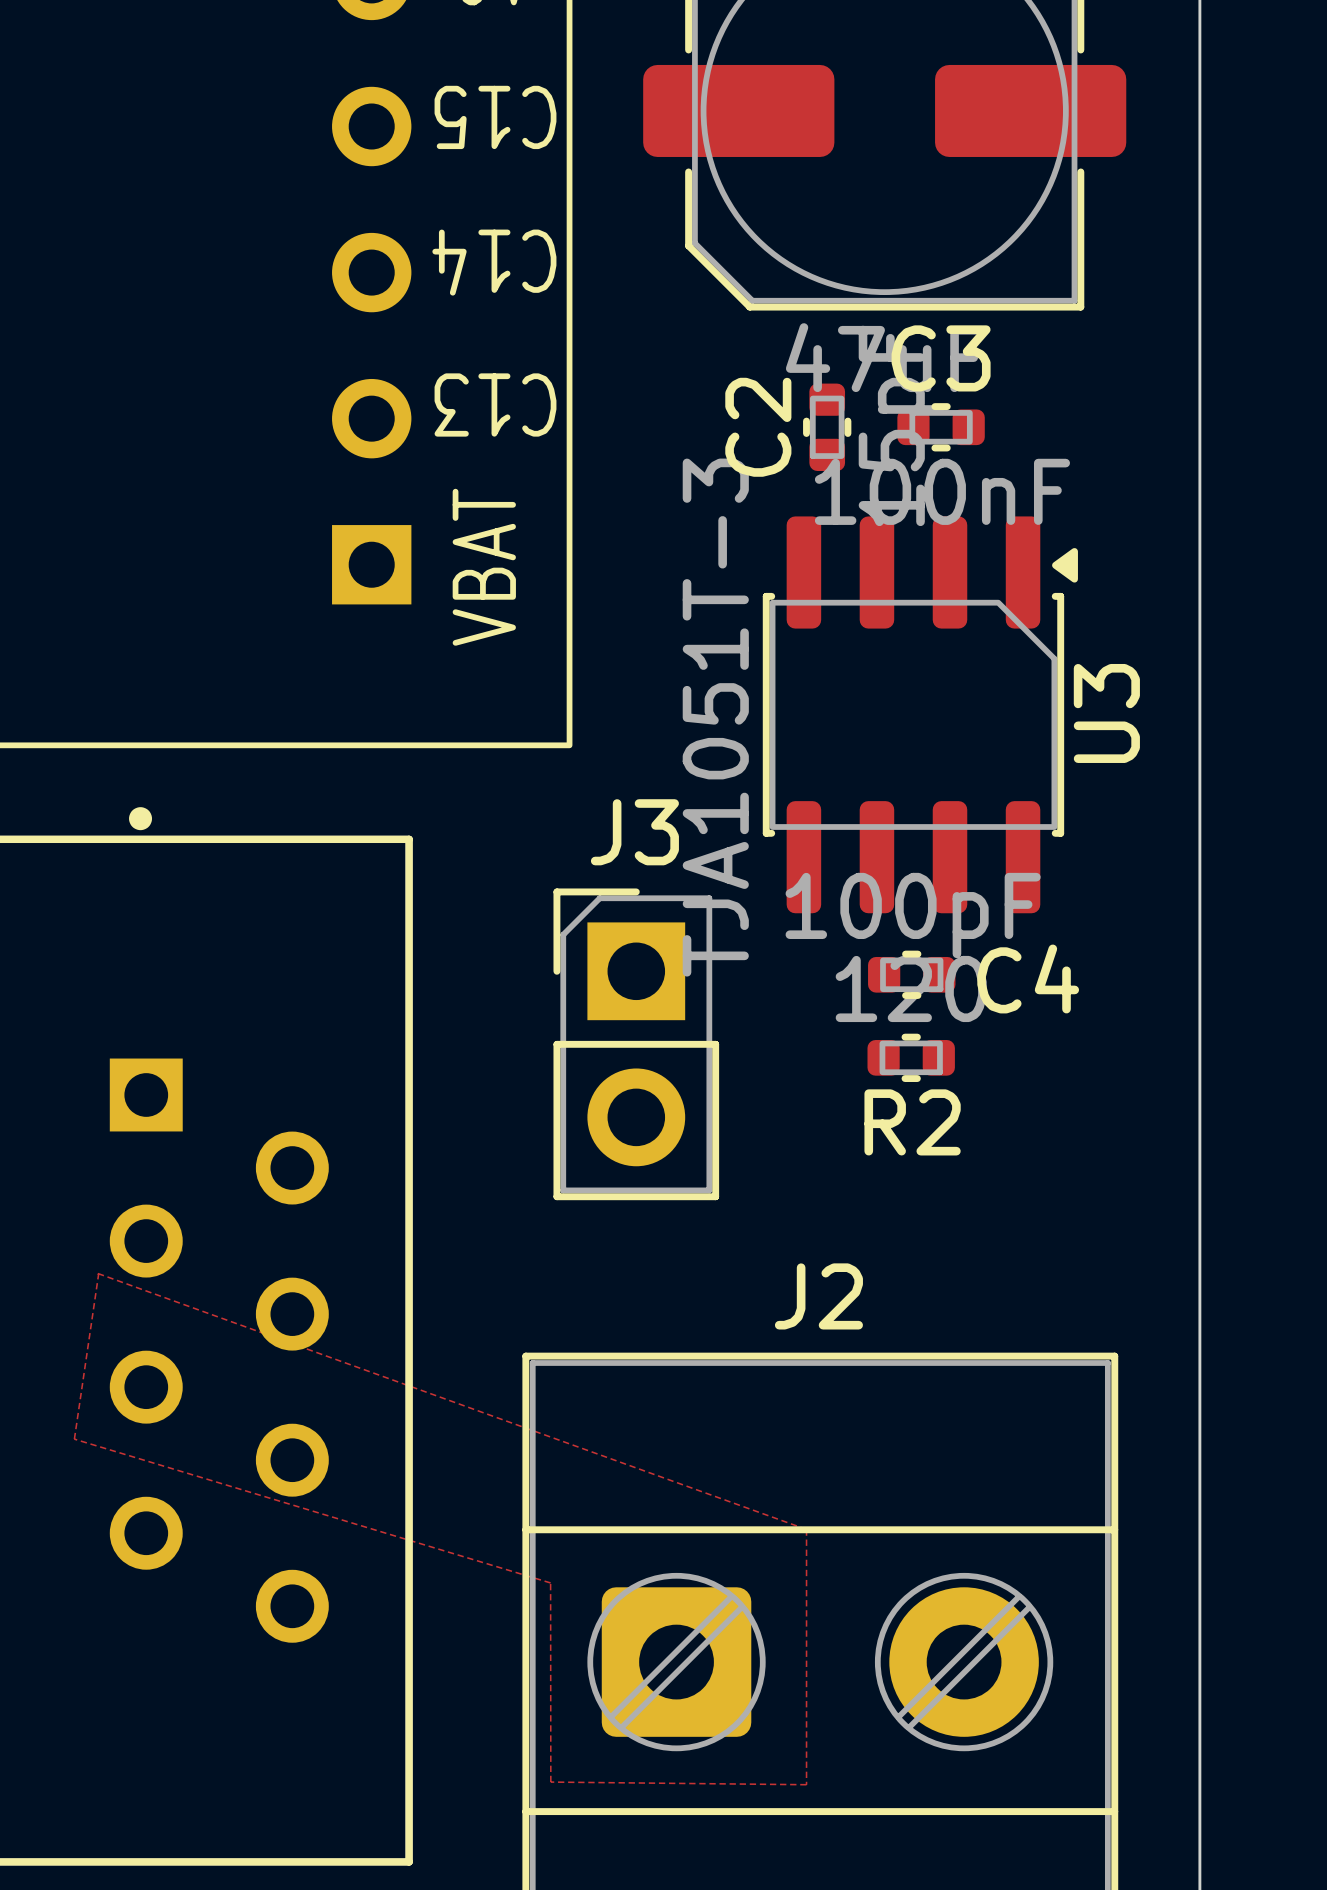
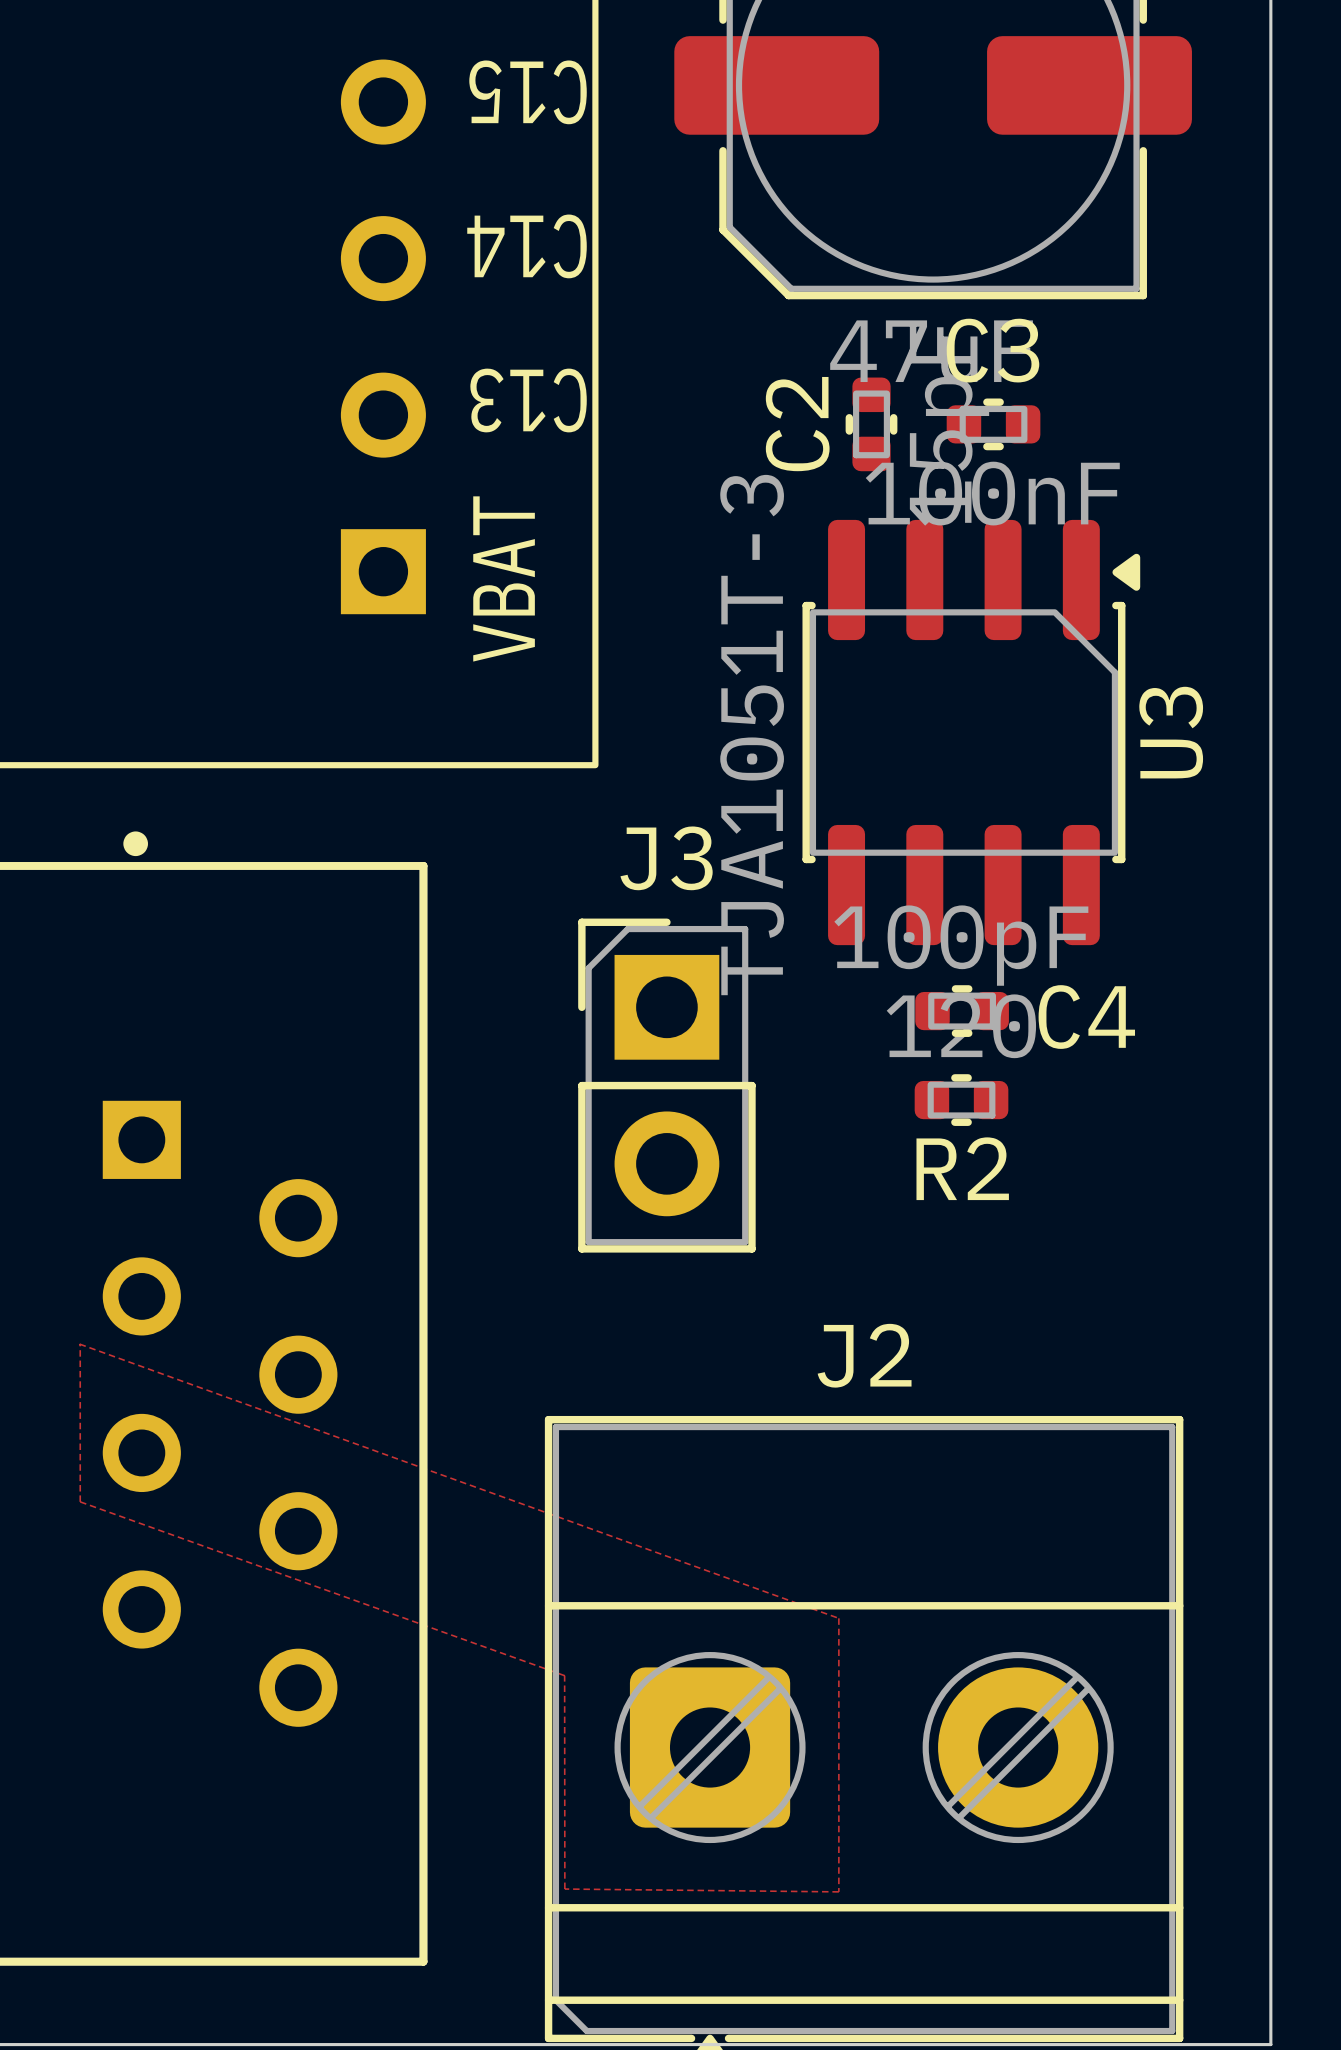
zone outline: (97, 1273) (806, 1529) (806, 1784) (550, 1782) (550, 1582) (74, 1439) (97, 1273) -> (79, 1344) (80, 1501) (564, 1675) (564, 1889) (838, 1891) (838, 1618) (79, 1344)

